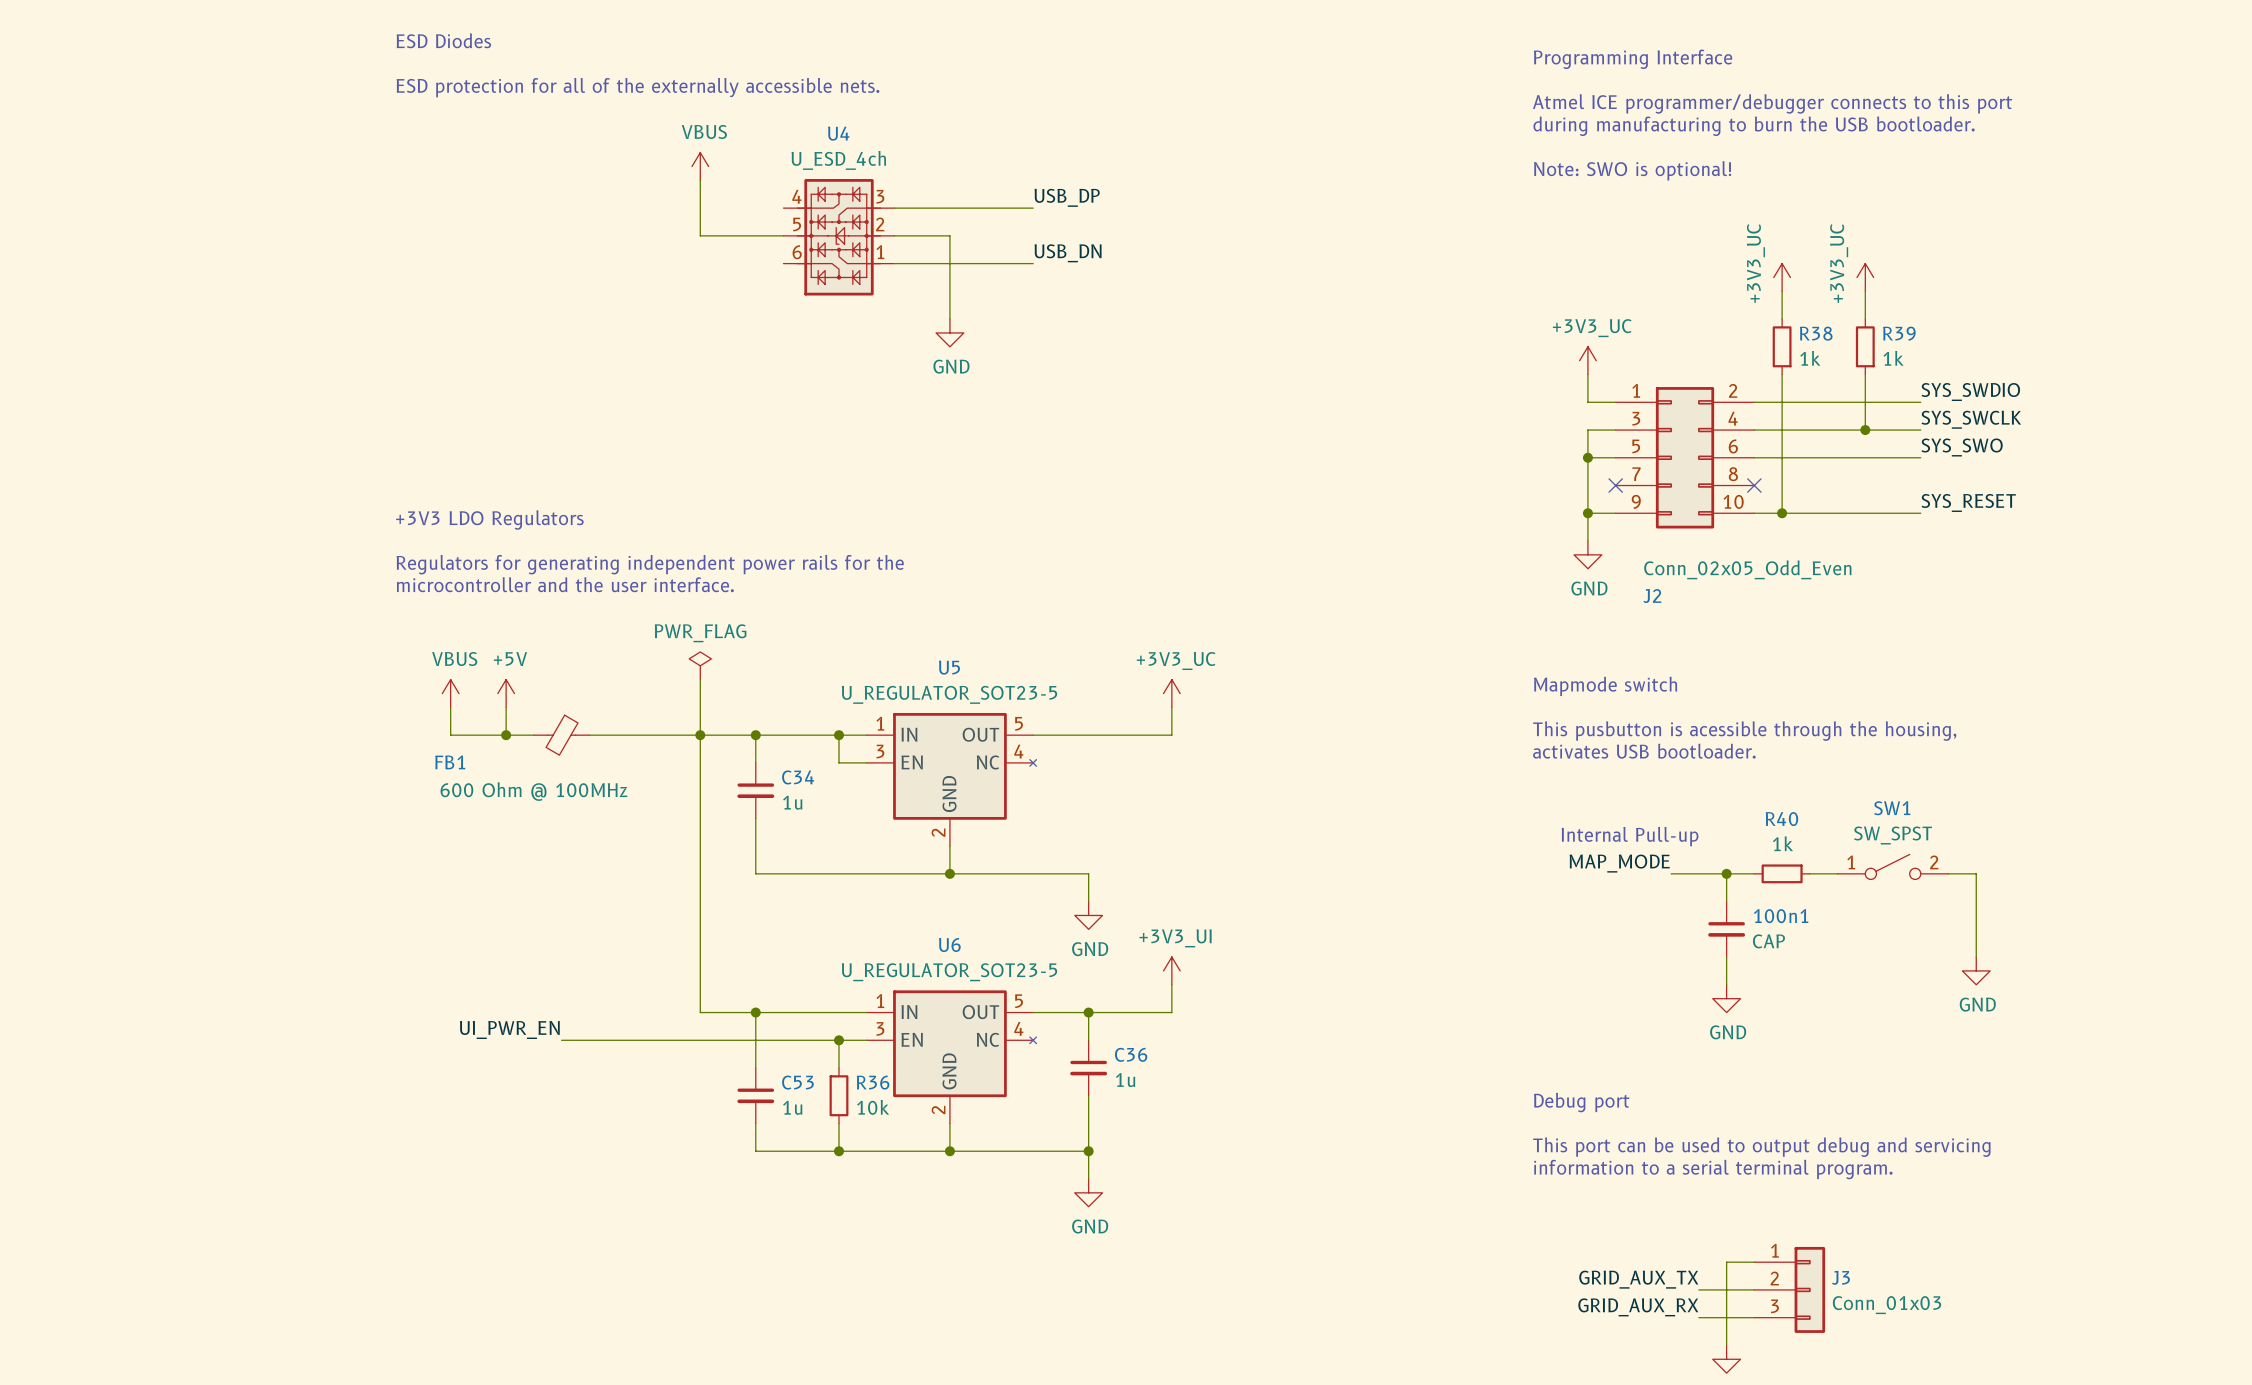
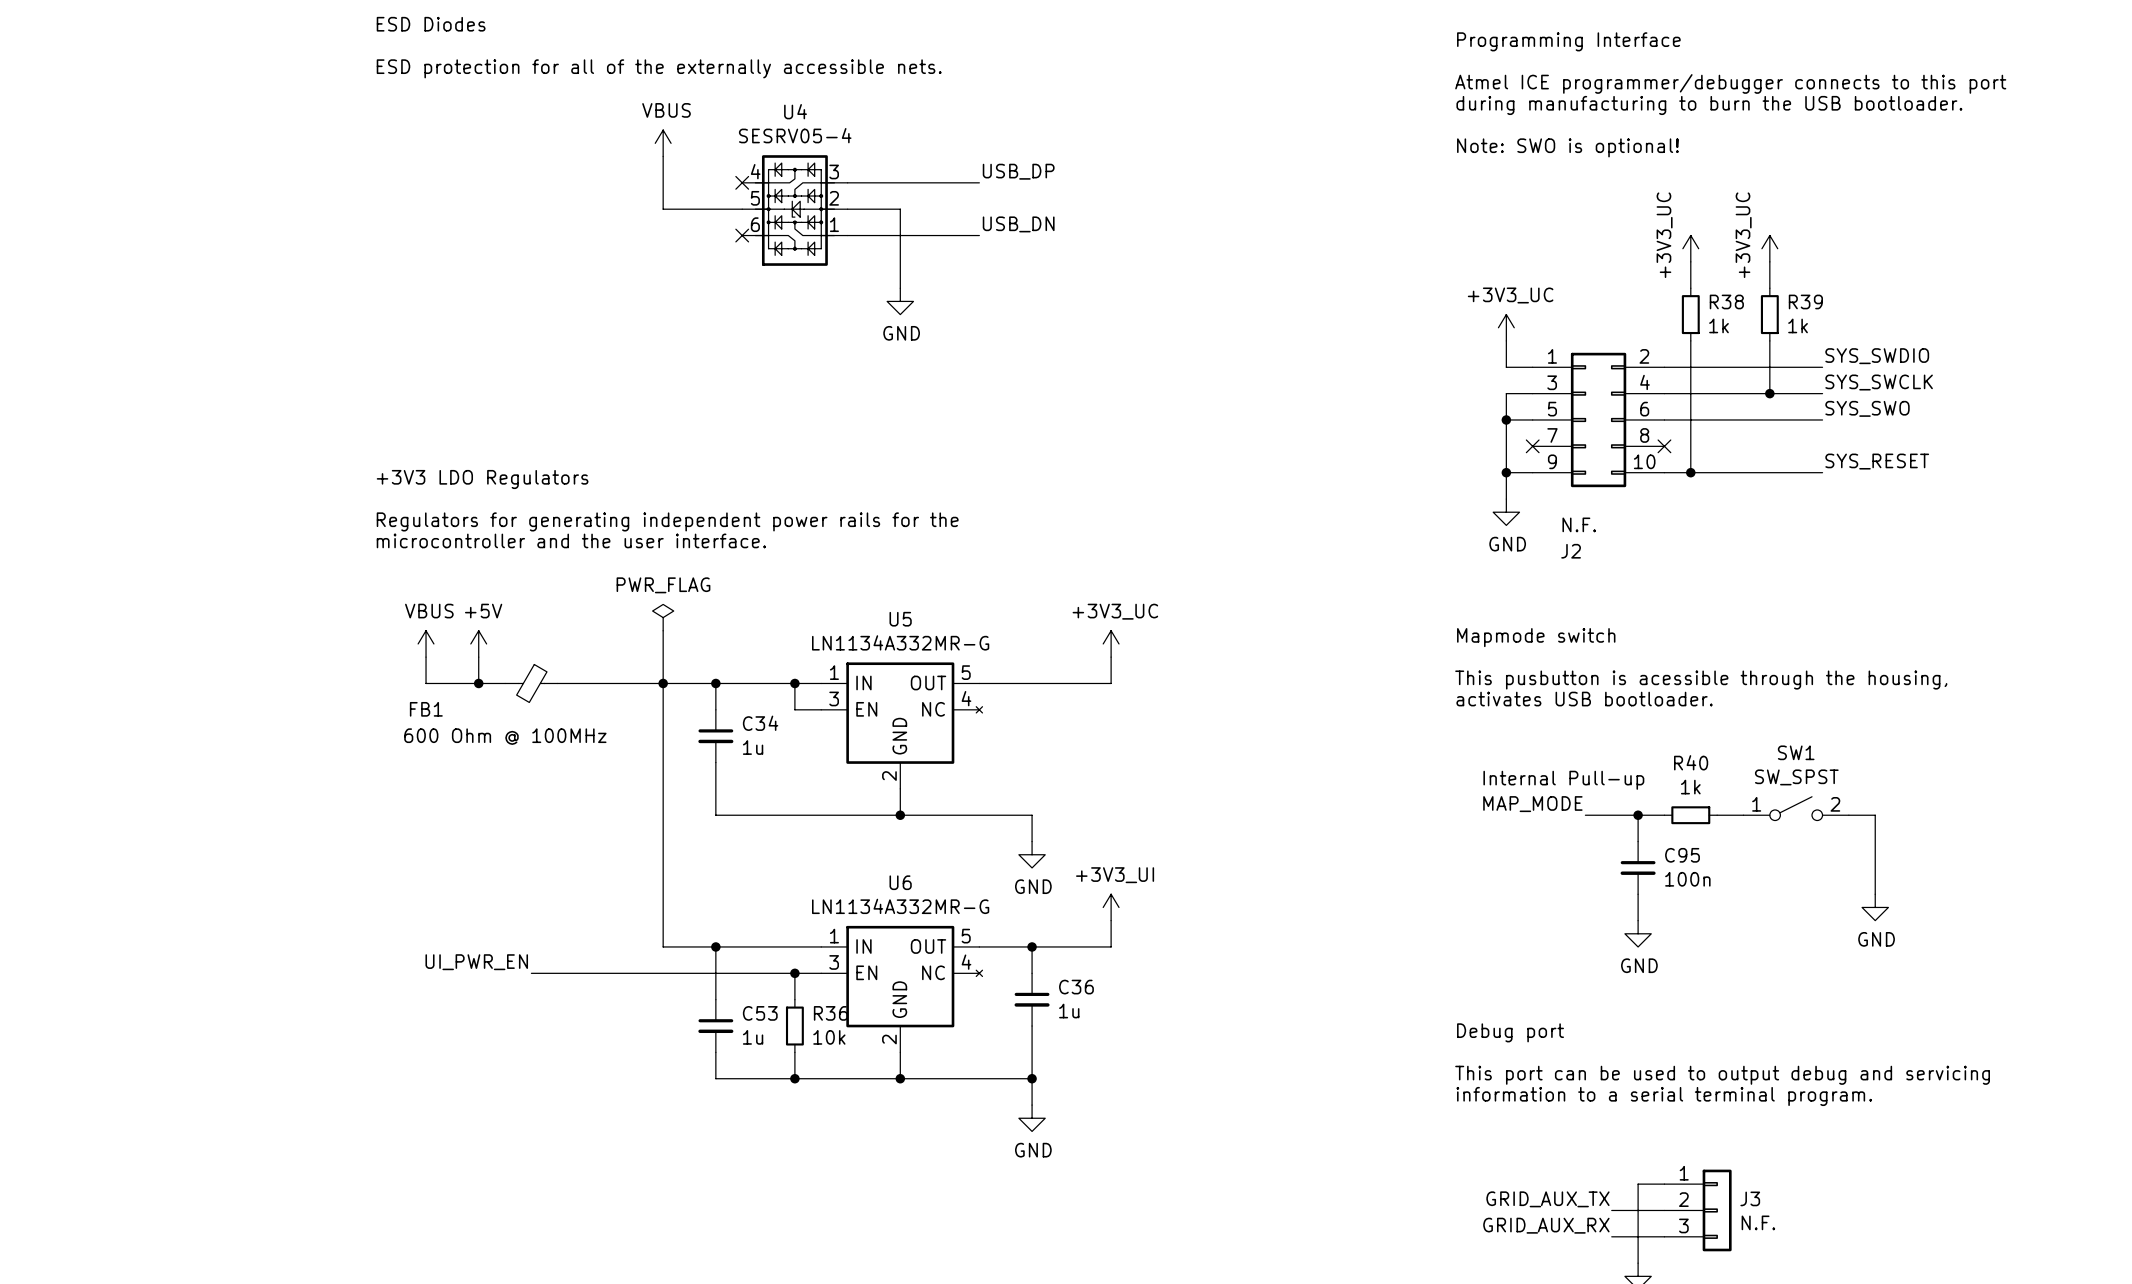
U4 value: U_ESD_4ch (838, 160) -> SESRV05-4 (795, 135)
no-connect mark: none -> (742, 182)
no-connect mark: none -> (742, 235)
J2 value: Conn_02x05_Odd_Even (1747, 569) -> N.F. (1579, 524)
U5 value: U_REGULATOR_SOT23-5 (949, 694) -> LN1134A332MR-G (900, 642)
100n1 name: 100n1 (1781, 916) -> C95 (1682, 855)
100n1 value: CAP (1768, 941) -> 100n (1687, 879)
U6 value: U_REGULATOR_SOT23-5 (949, 972) -> LN1134A332MR-G (900, 906)
J3 value: Conn_01x03 (1886, 1305) -> N.F. (1758, 1222)

